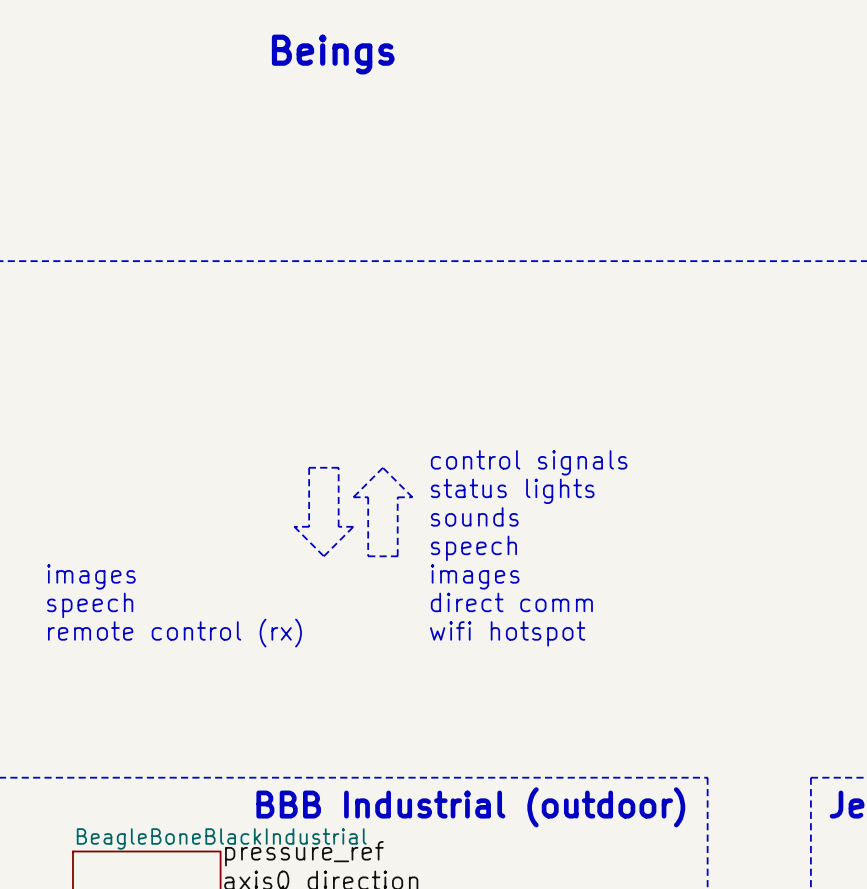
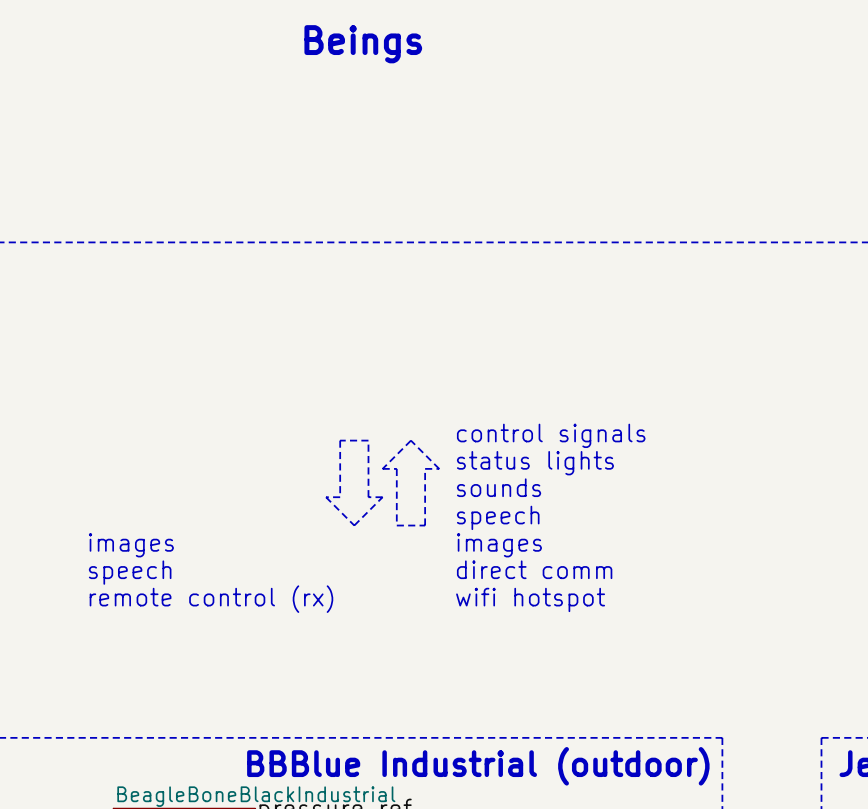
text: BBB Industrial (outdoor) (470, 807) -> BBBlue Industrial (outdoor) (478, 766)

